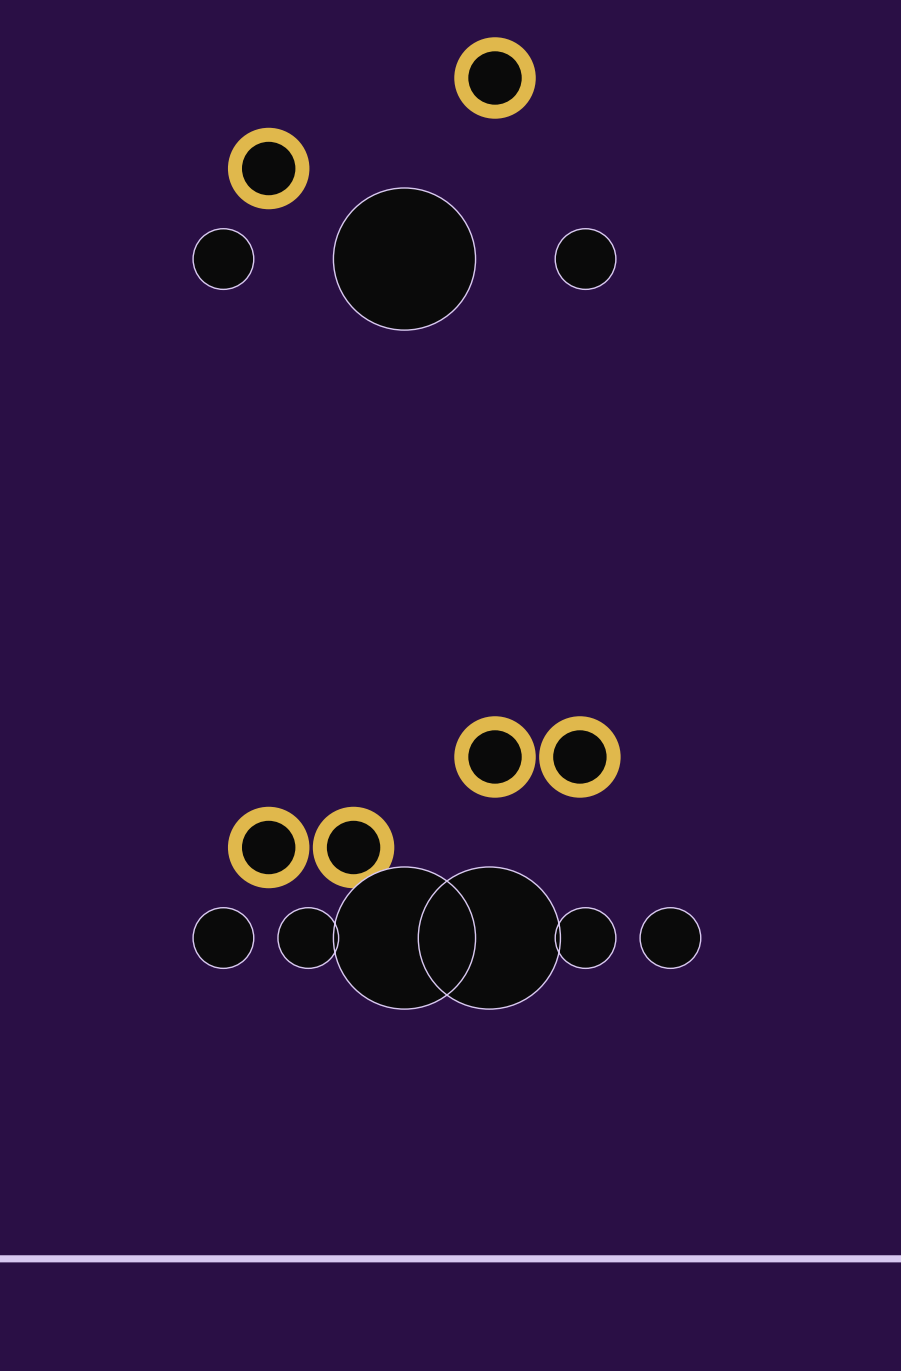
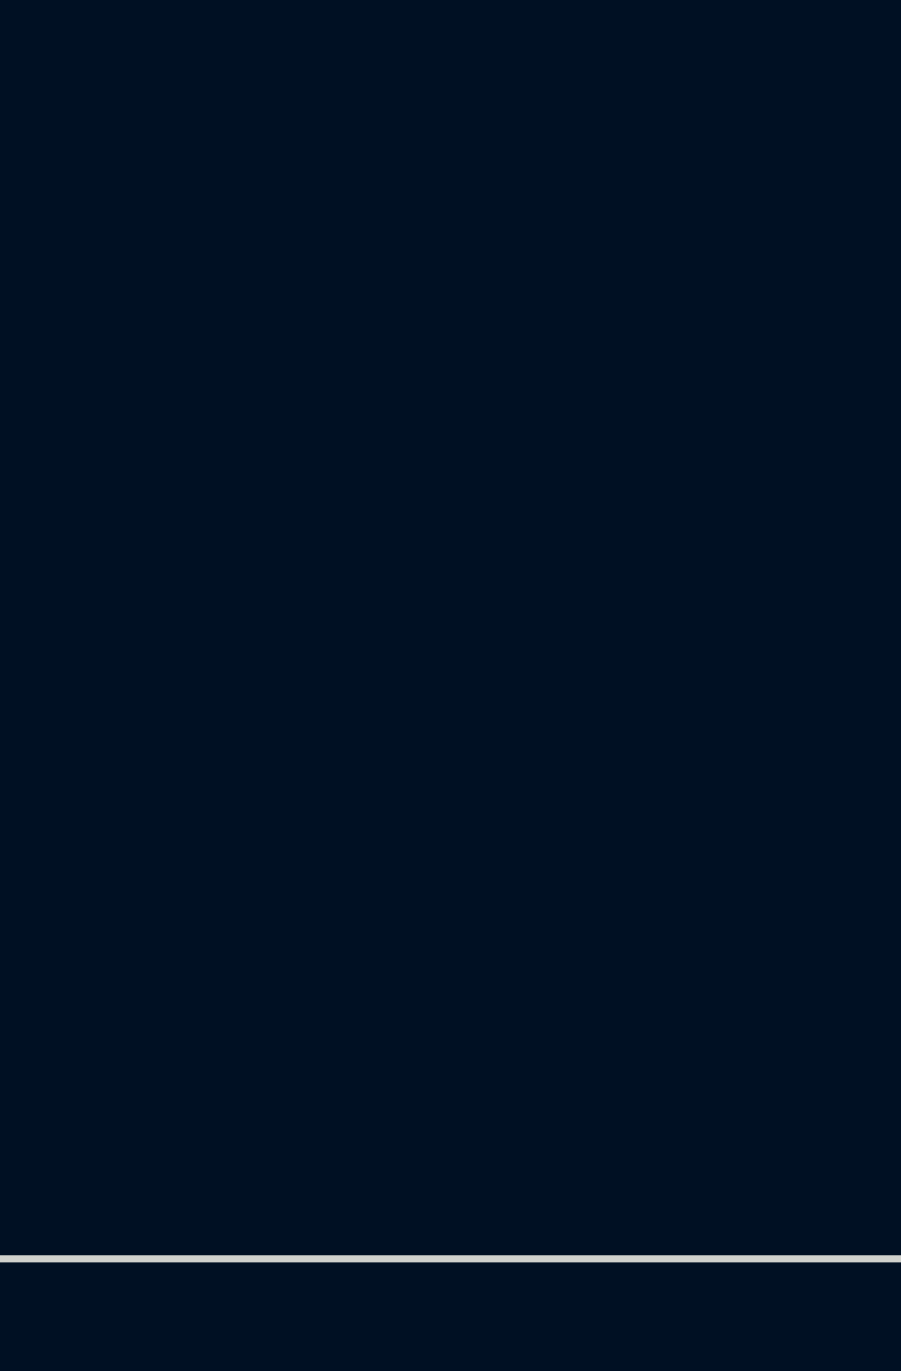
part: (404, 183) -> none
part: (404, 862) -> none
part: (489, 862) -> none

